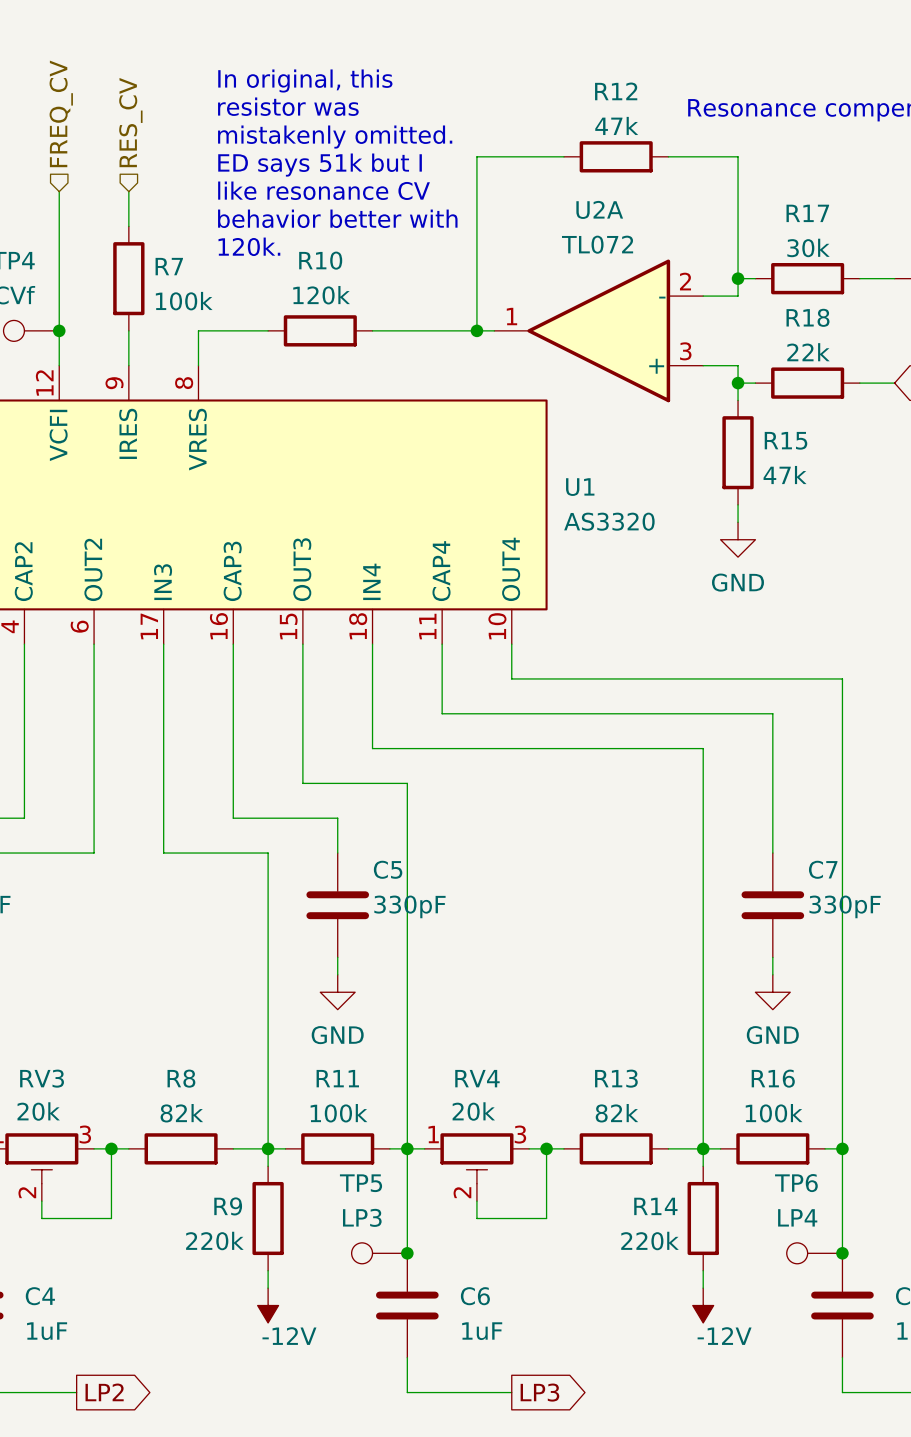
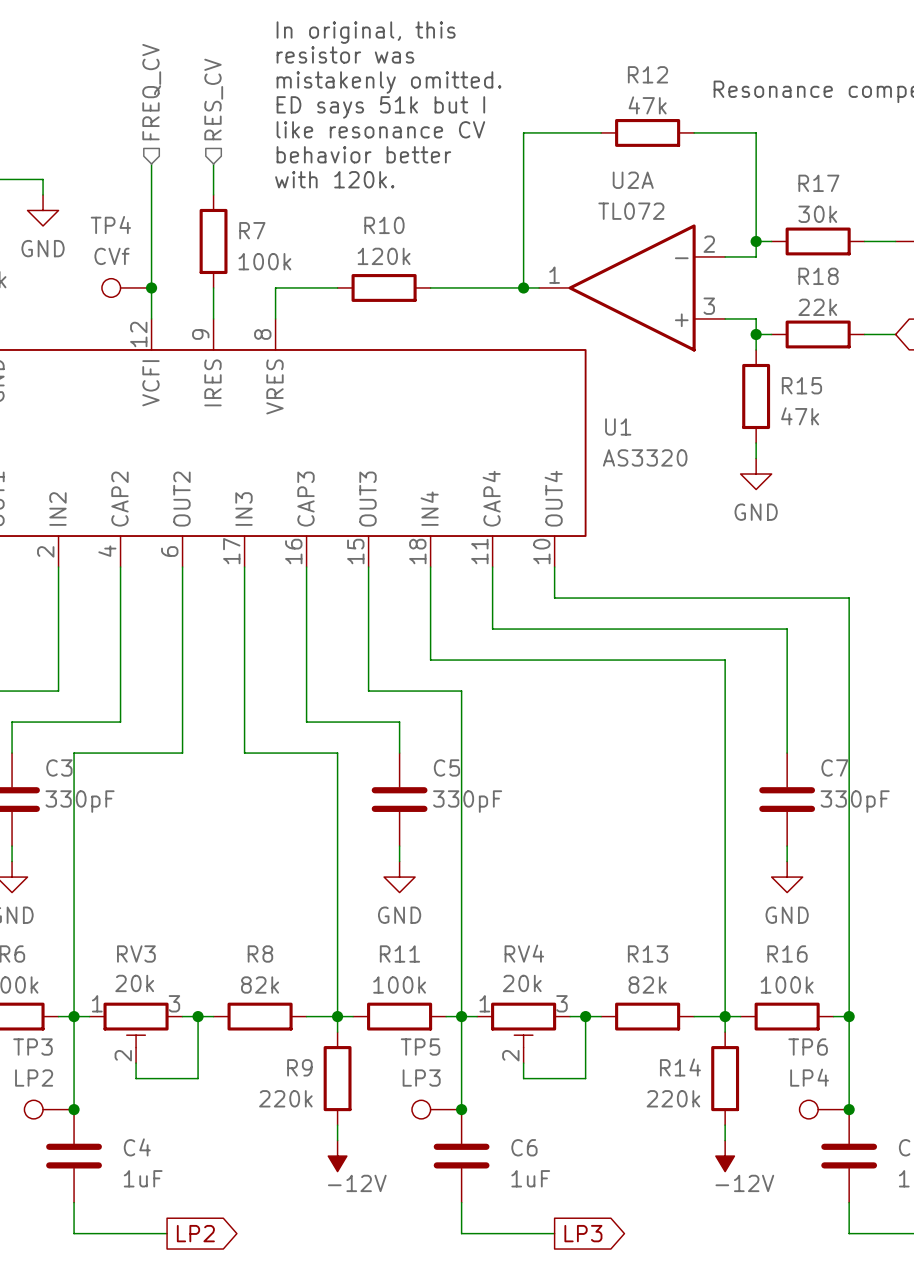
text position: In original, this (305, 80) -> In original, this (366, 32)
text position: resistor was (288, 106) -> resistor was (345, 54)
text position: mistakenly omitted. (335, 137) -> mistakenly omitted. (389, 82)
text position: ED says 51k but I (320, 165) -> ED says 51k but I (380, 107)
text: none -> behavior better (363, 154)
text position: like resonance CV (324, 190) -> like resonance CV (380, 129)
text: none -> with 120k. (334, 179)
text: behavior better with (337, 218) -> none
text: 120k. (249, 246) -> none

